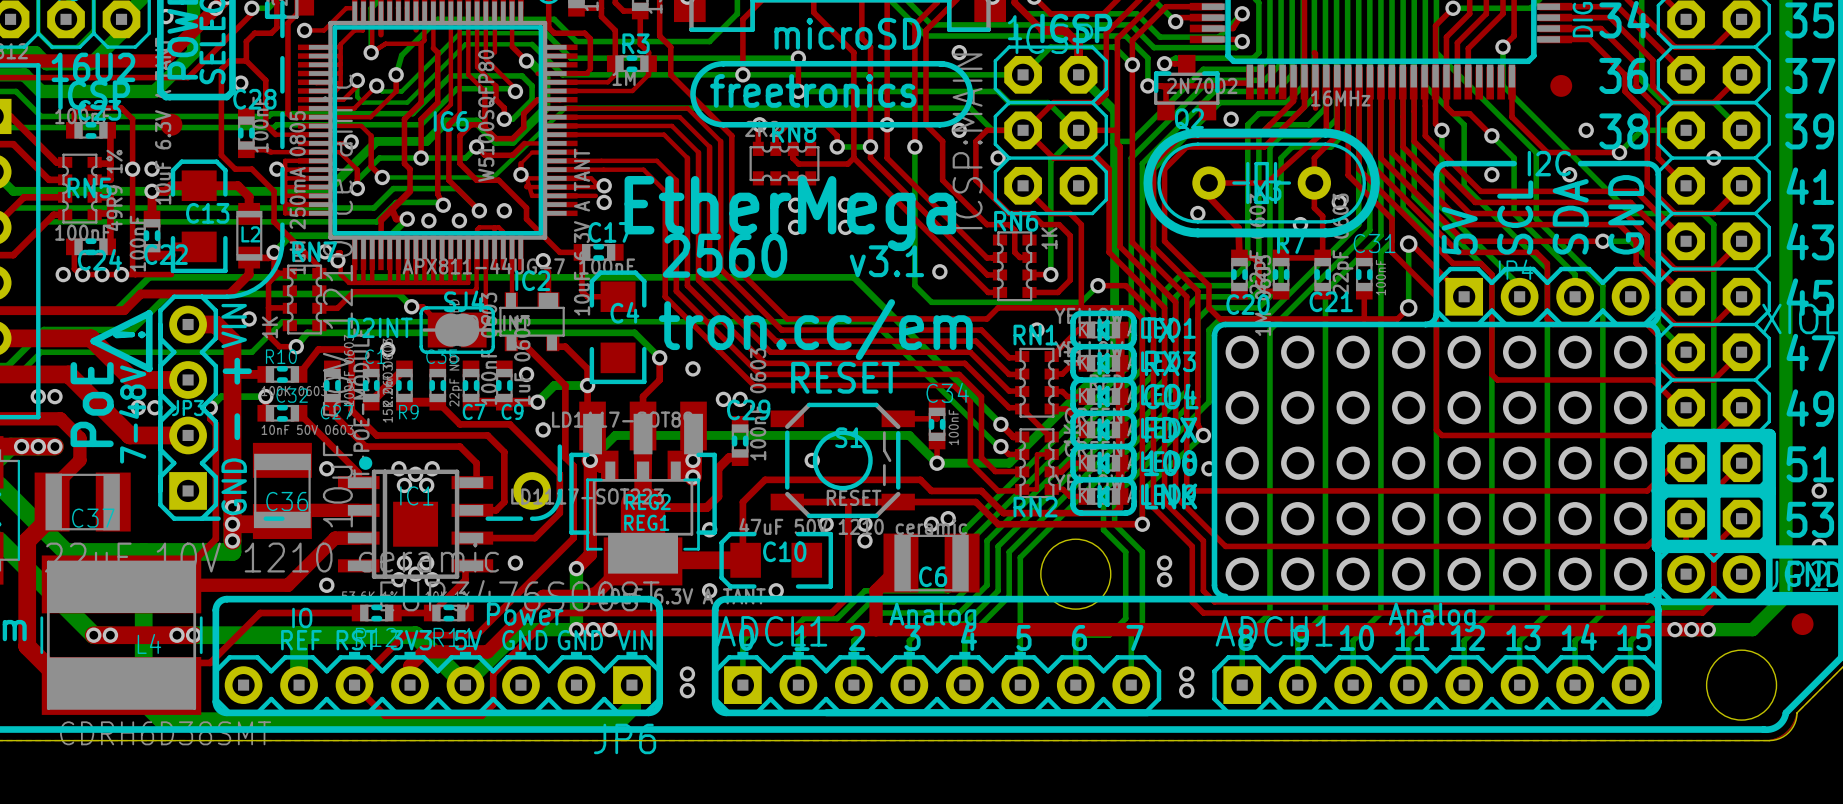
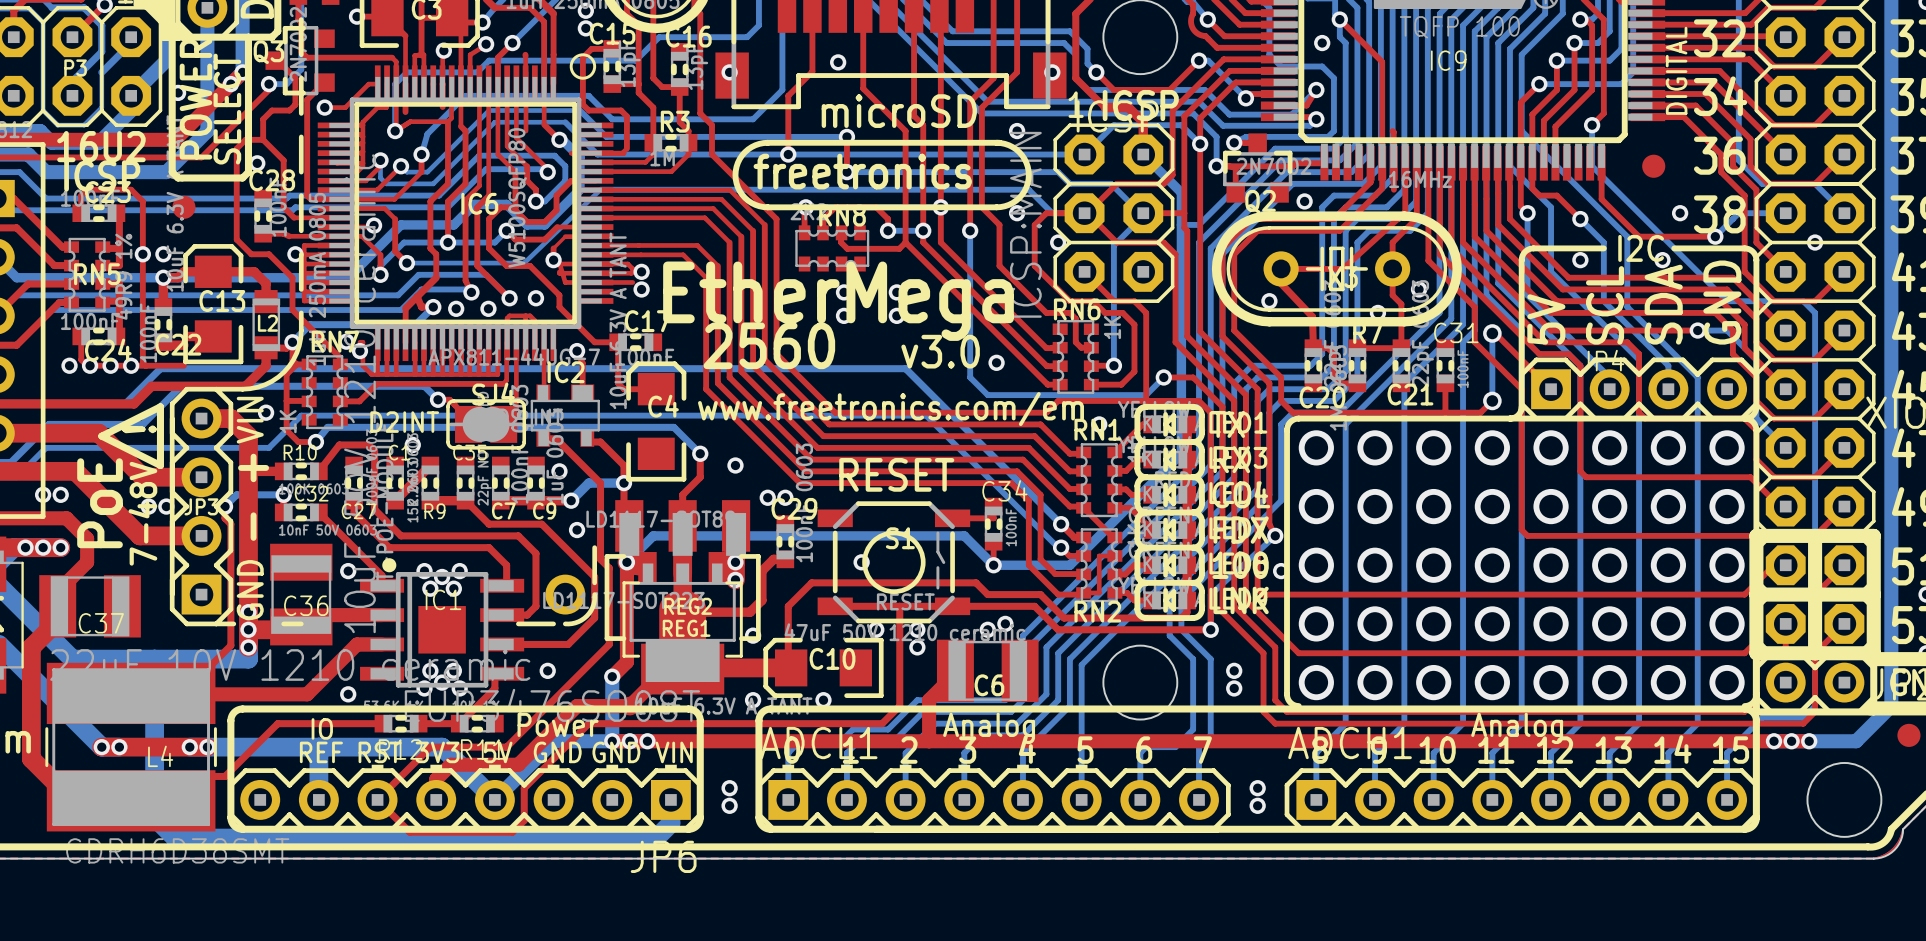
text: v3.1 (886, 261) -> v3.0 (940, 351)
text: none -> www.freetronics.com/em (891, 409)
text: tron.cc/em (815, 329) -> none

